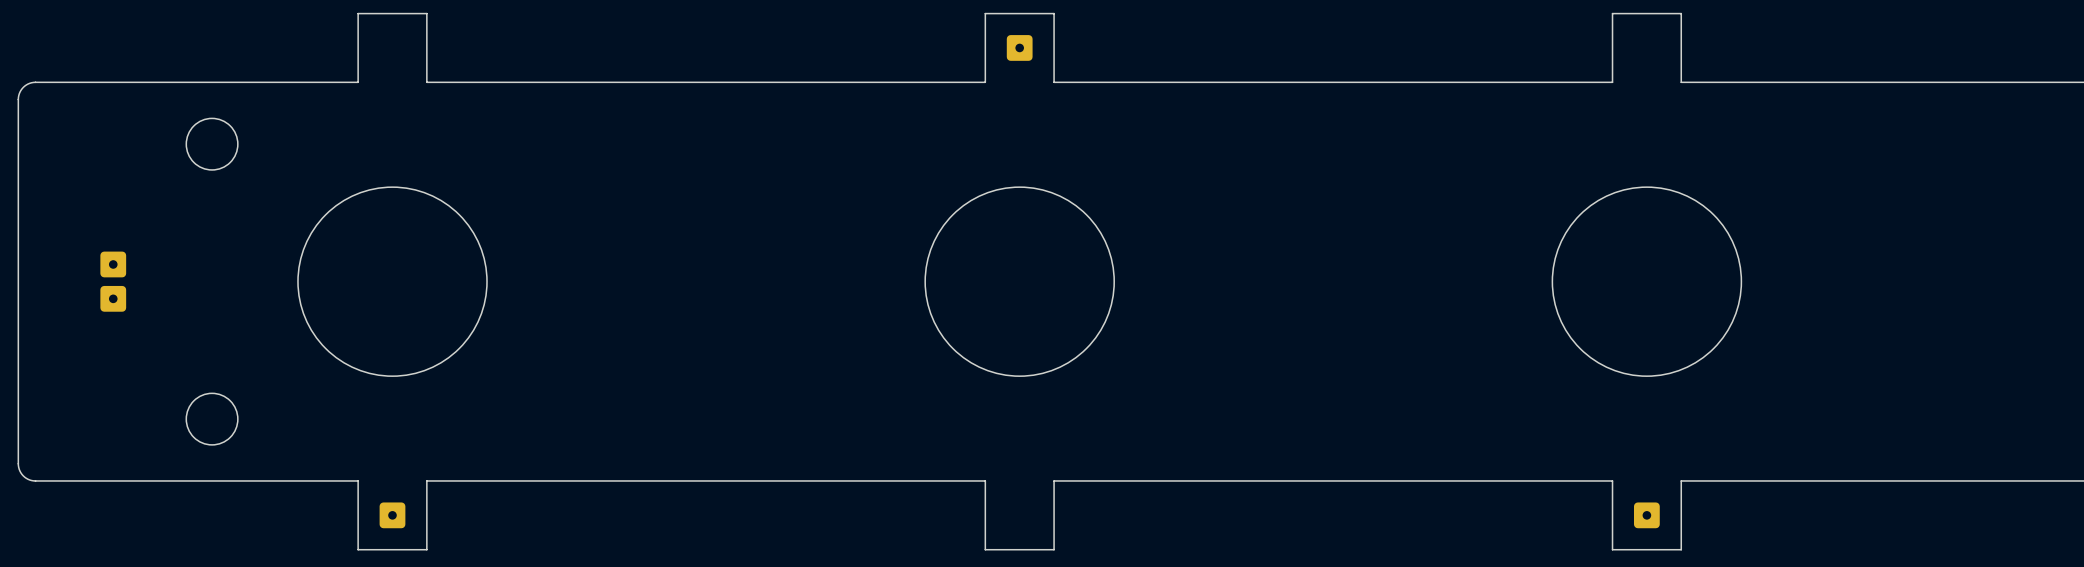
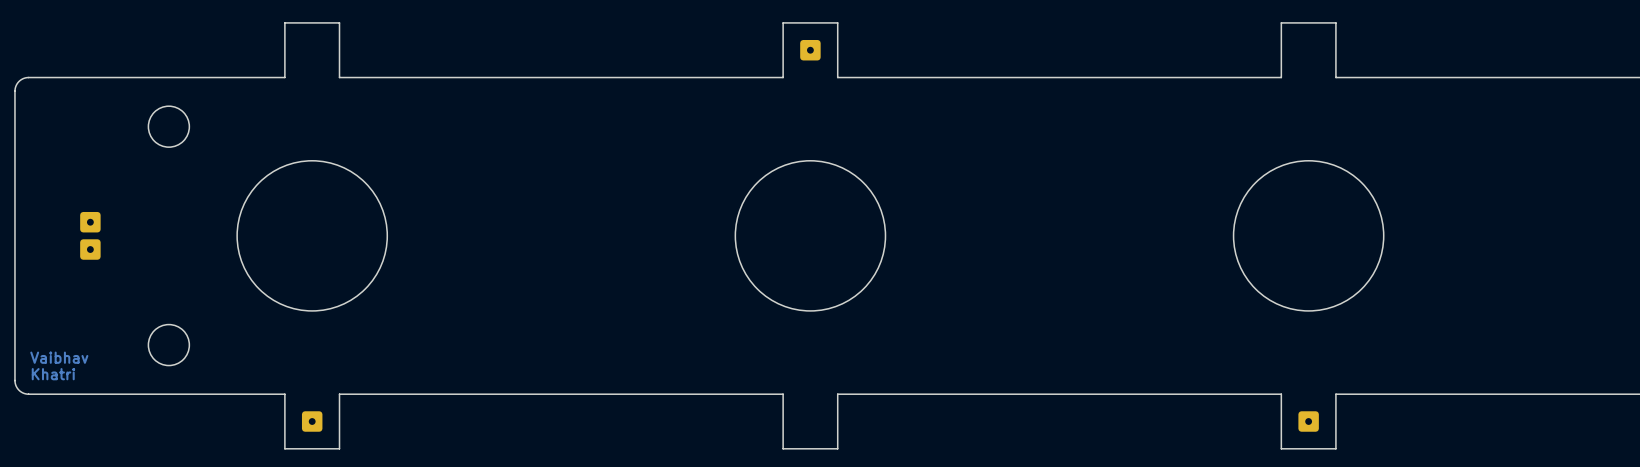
text: none -> Vaibhav (59, 357)
text: none -> Khatri (53, 374)

